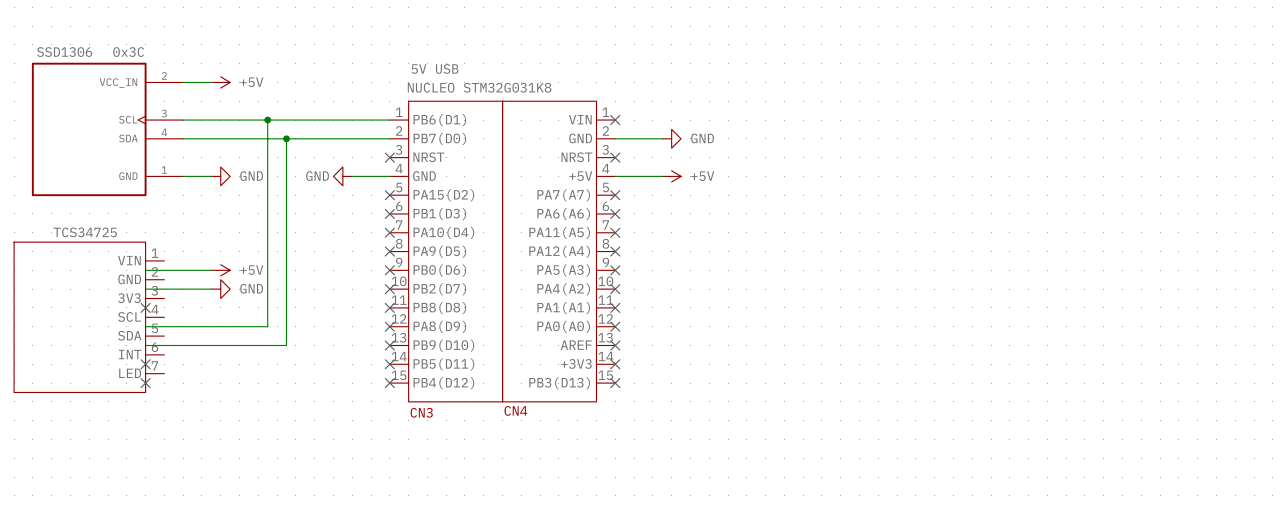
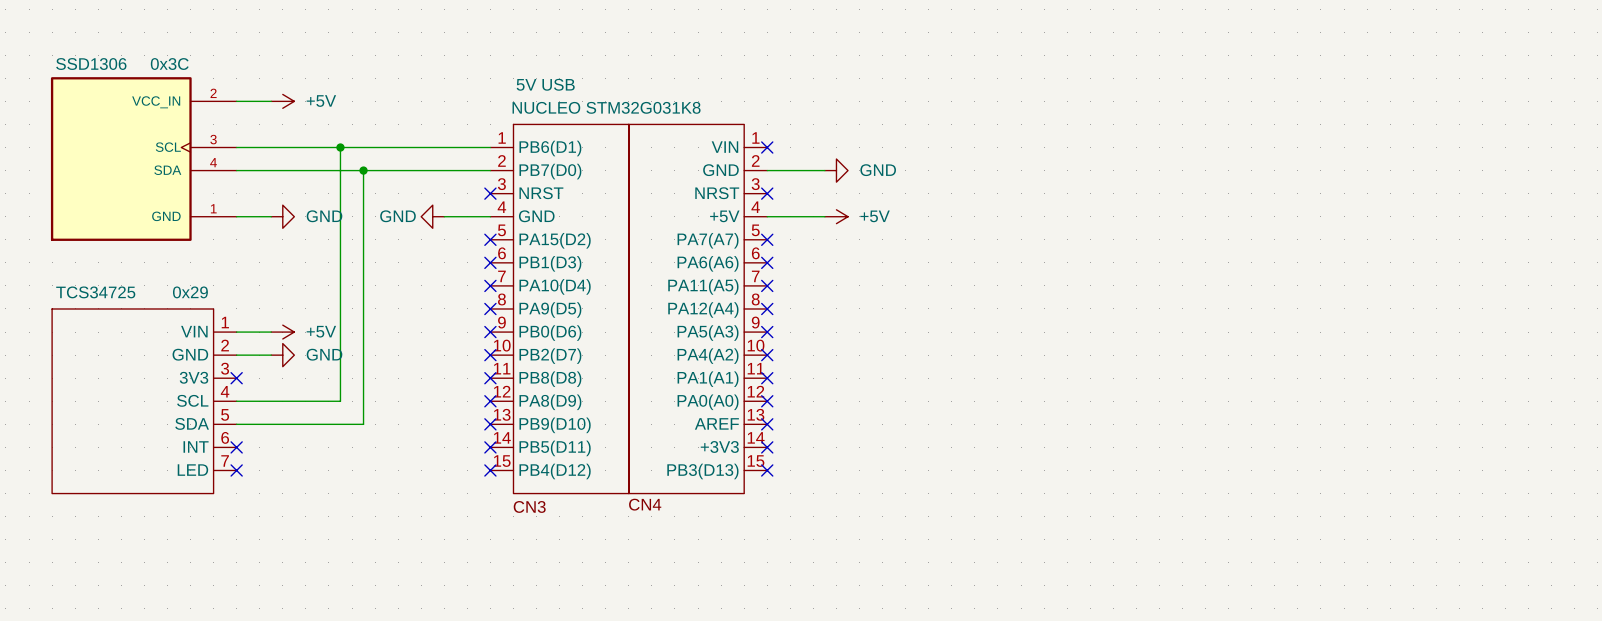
no-connect mark: (145, 307) -> none
no-connect mark: none -> (236, 378)
part: TCS34725 (89, 317) -> none
part: none -> TCS34725 (144, 401)
no-connect mark: (145, 364) -> none
no-connect mark: none -> (236, 447)
no-connect mark: (145, 383) -> none
no-connect mark: none -> (236, 470)

